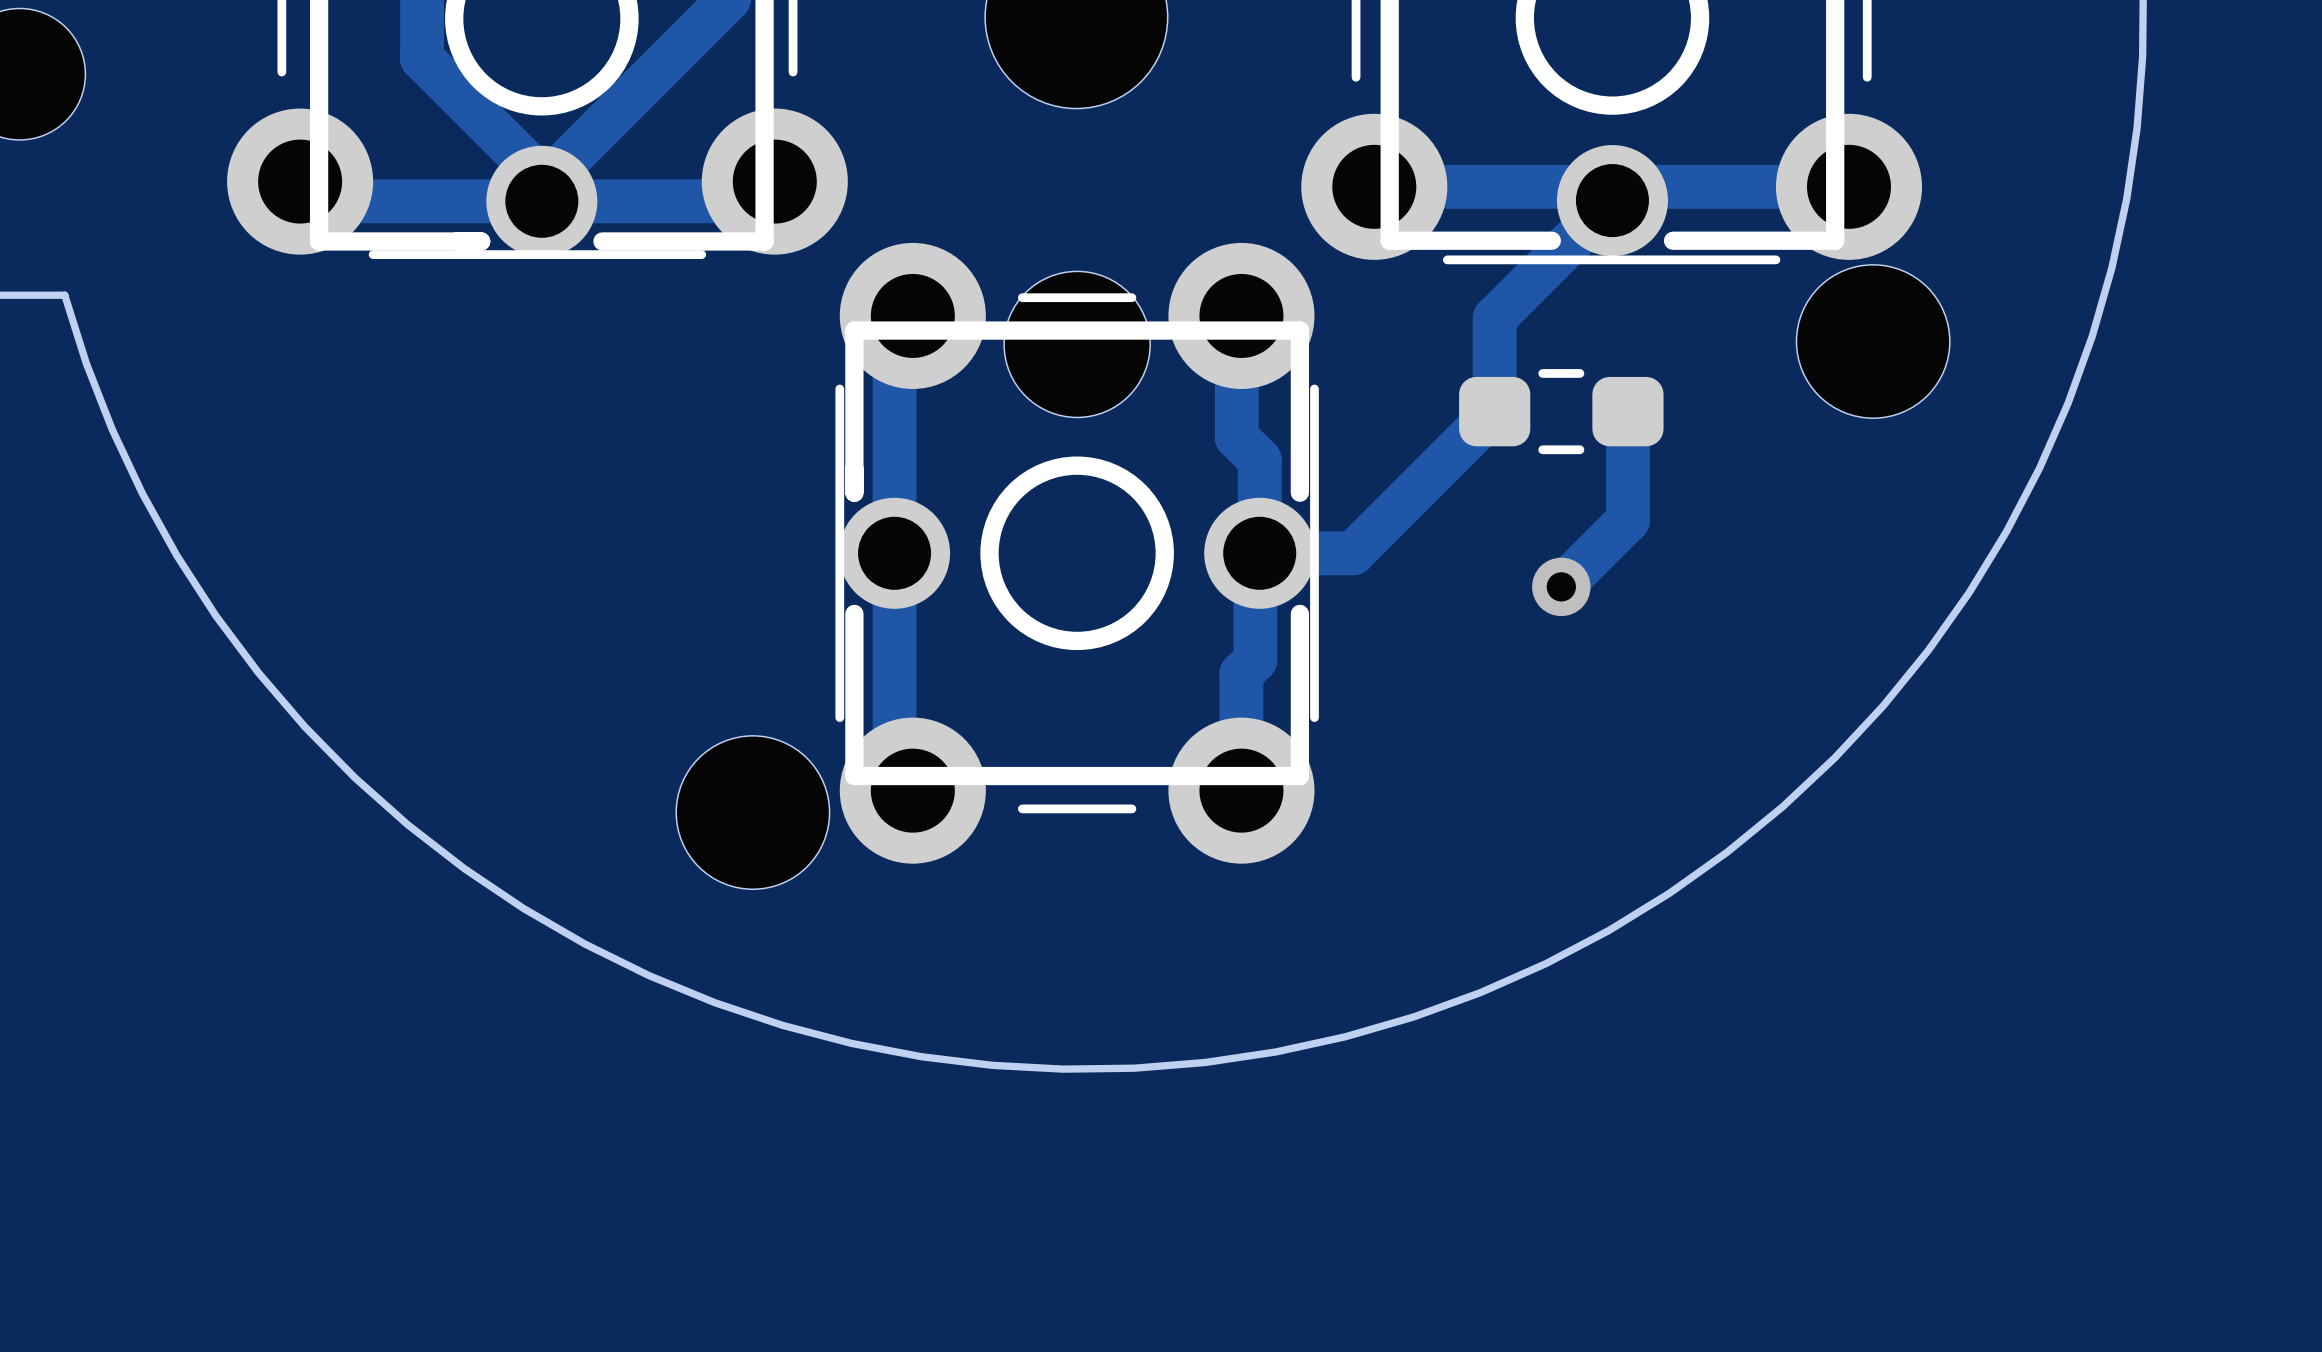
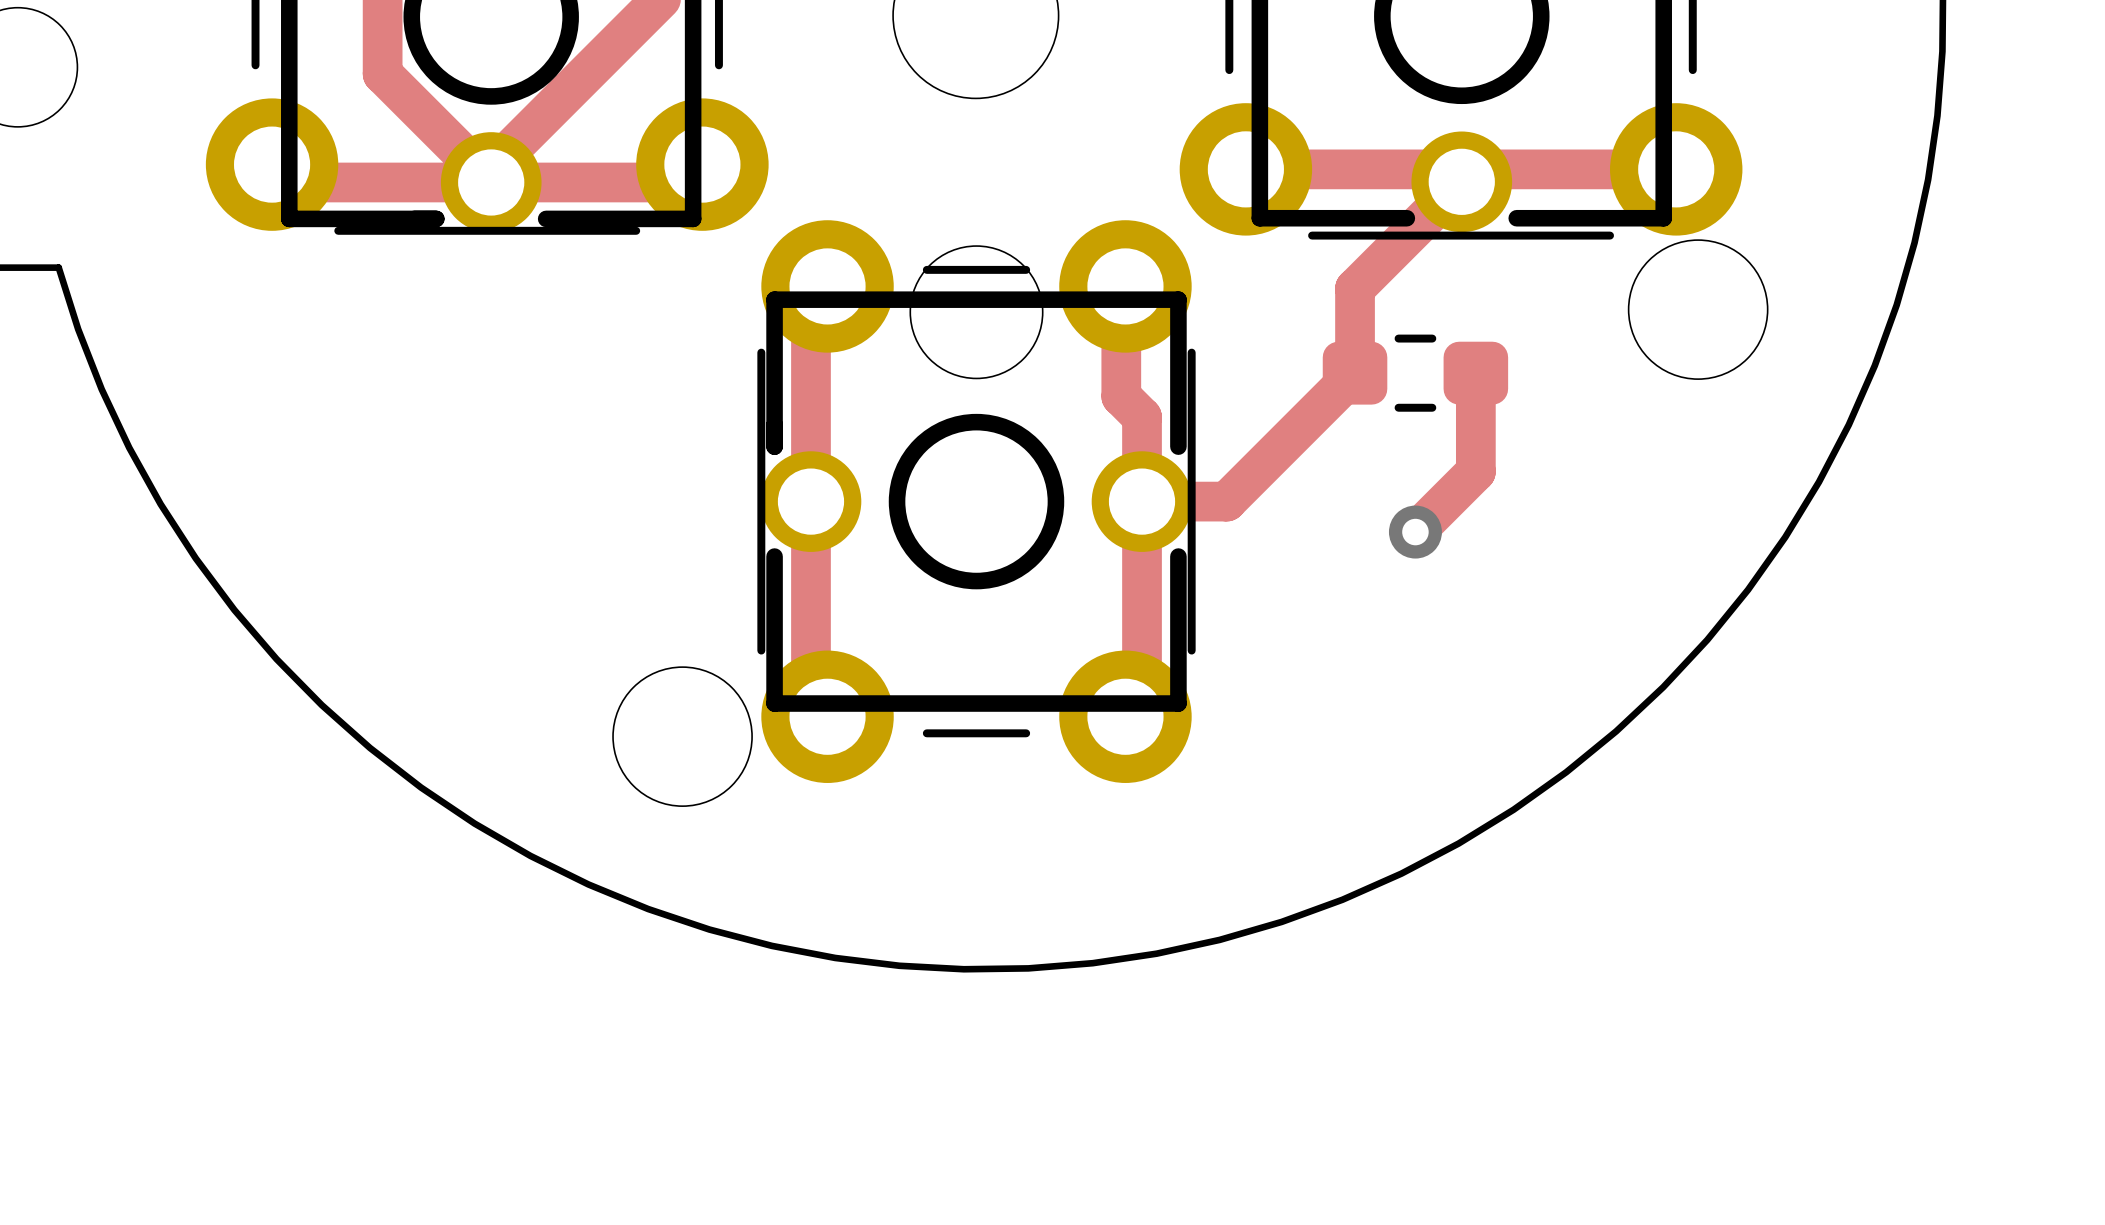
track: (422, 58) (541, 178) (541, 201) -> (382, 52) (382, 73) (491, 182)
track: (1259, 553) (1255, 557) (1255, 659) (1241, 673) (1241, 790) -> (1142, 501) (1142, 700) (1125, 716)

